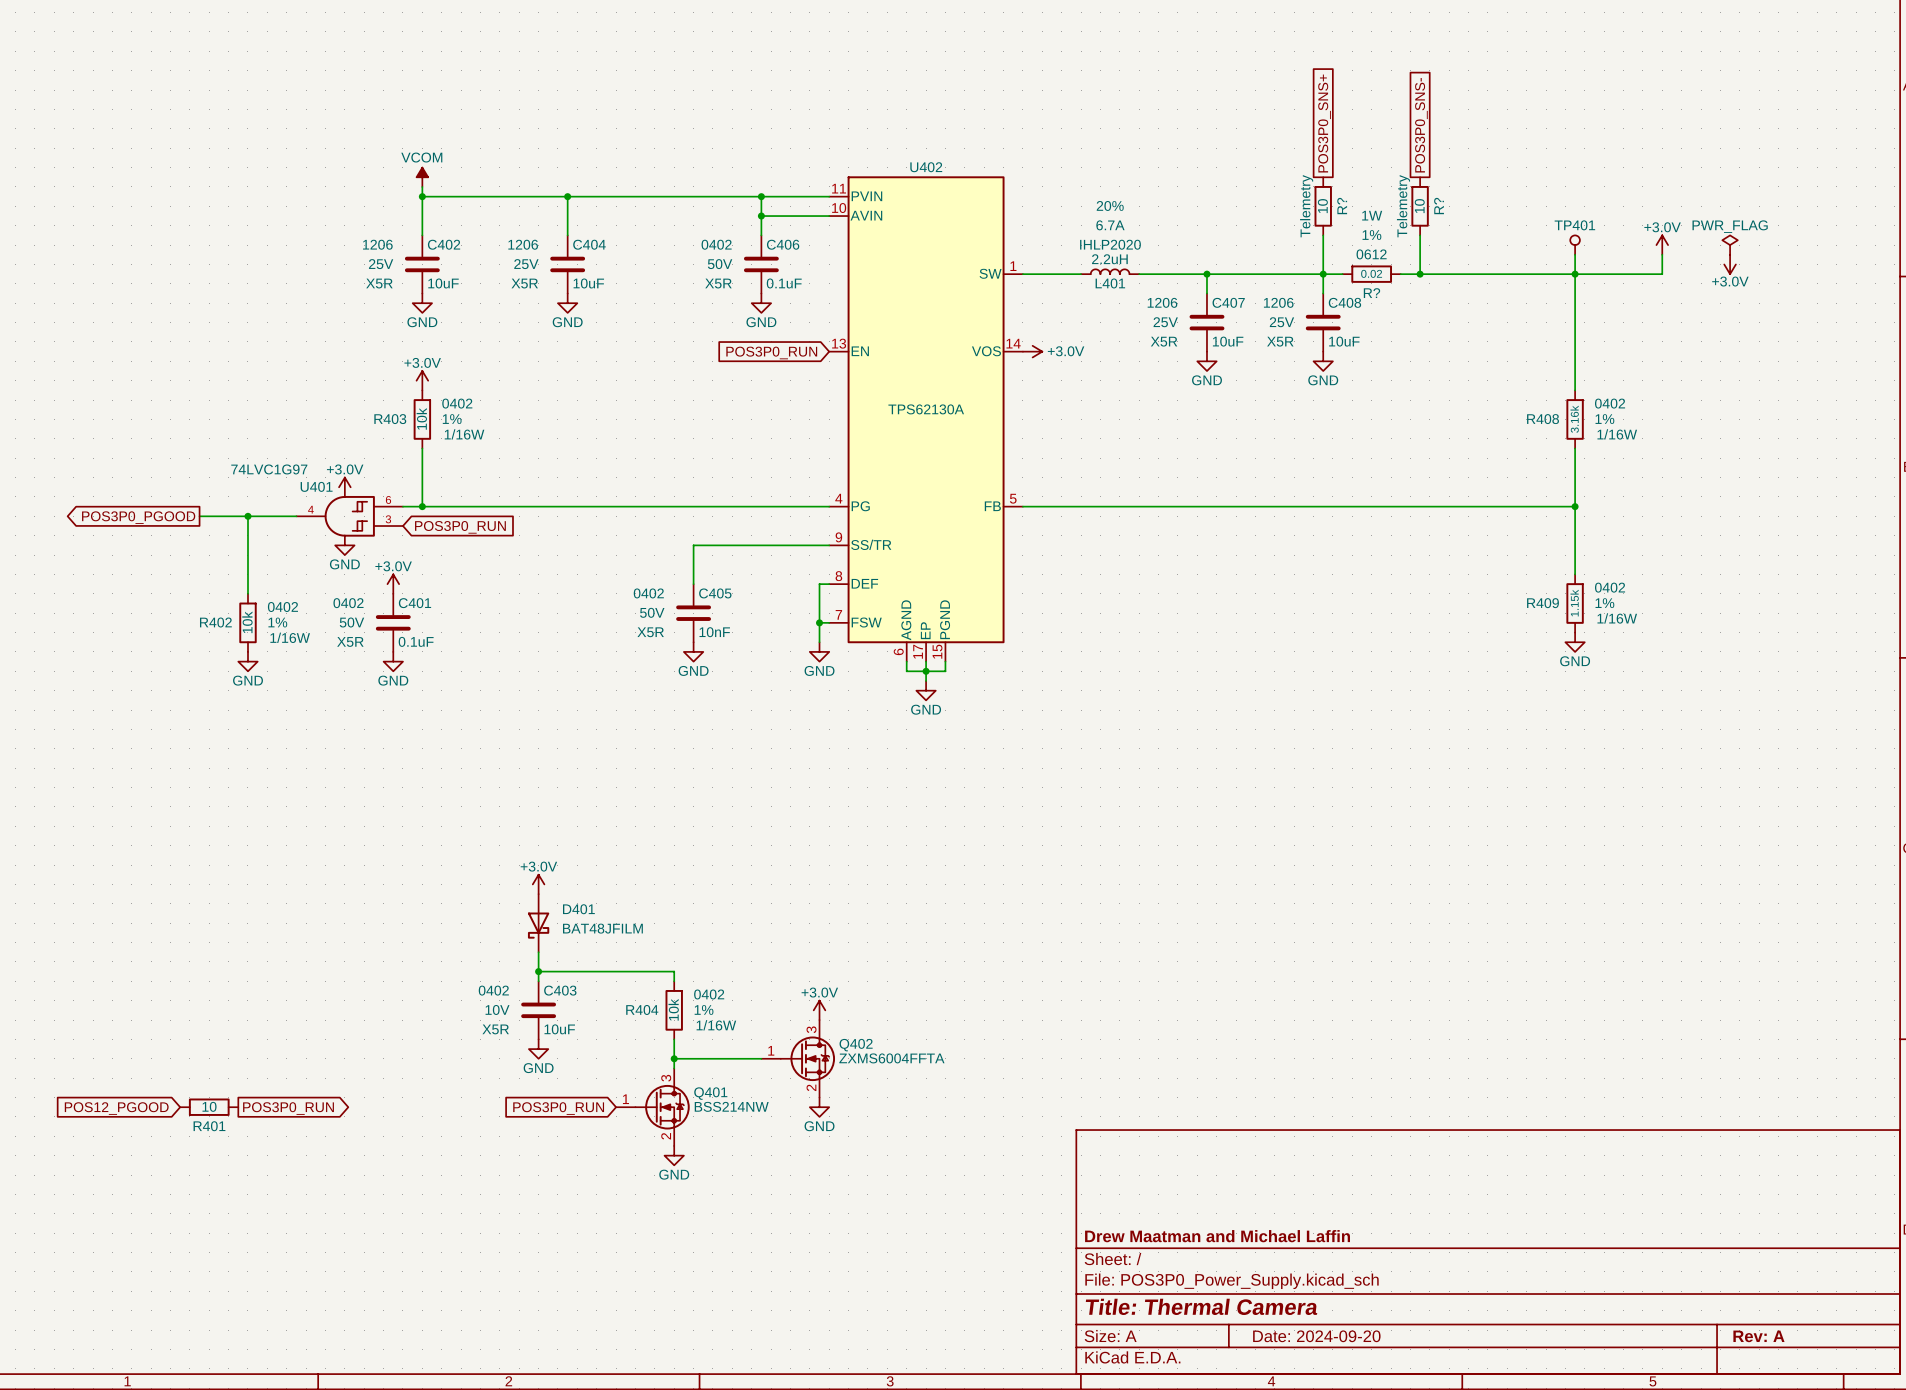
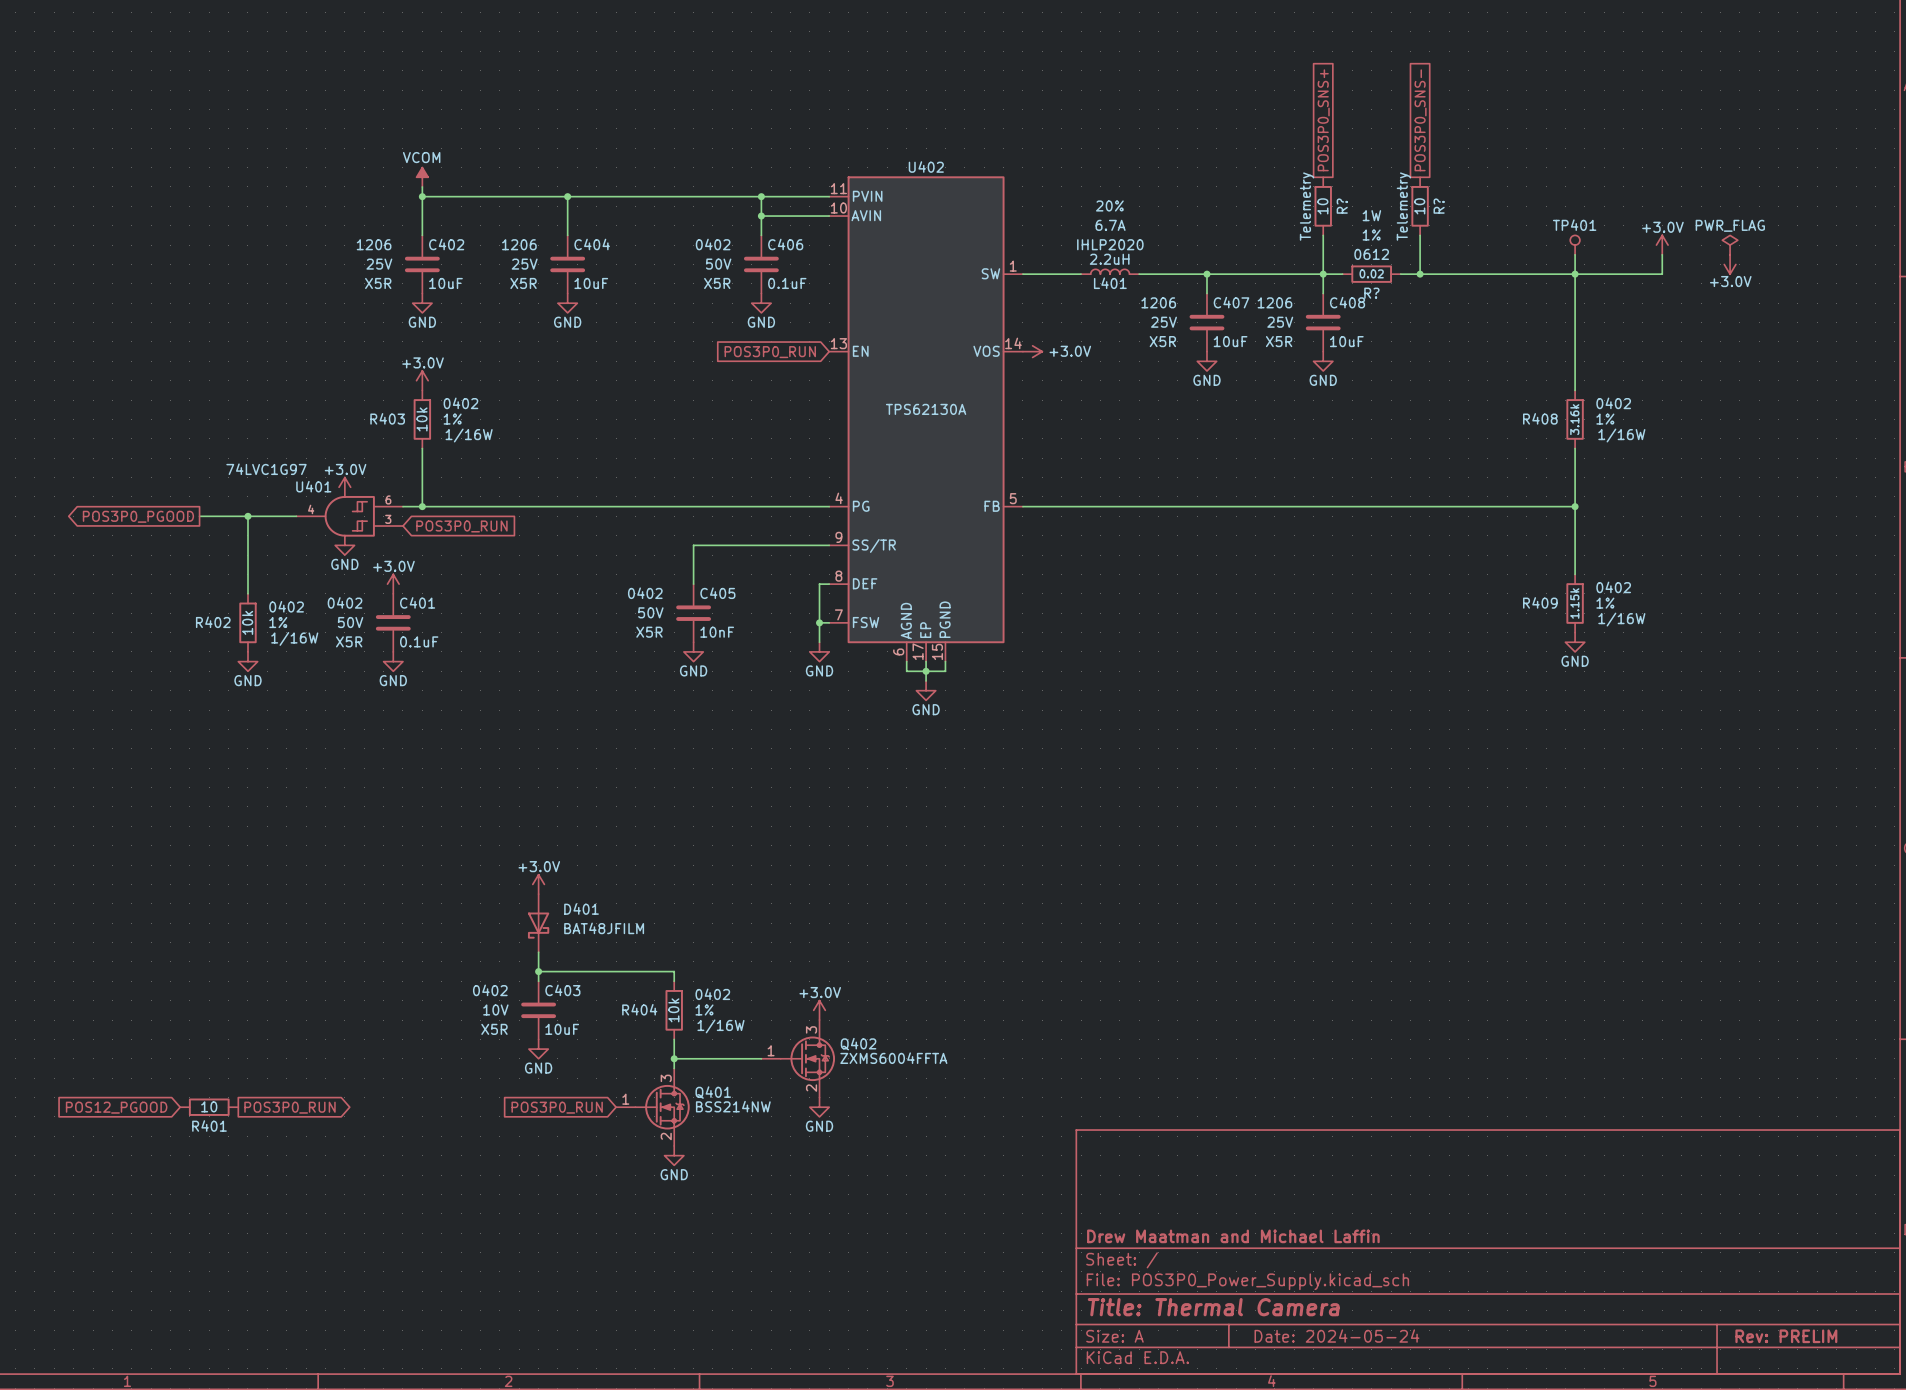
title block: Date: 2024-09-20 (1316, 1336) -> Date: 2024-05-24 (1336, 1336)
title block: Rev: A (1758, 1336) -> Rev: PRELIM (1786, 1336)

